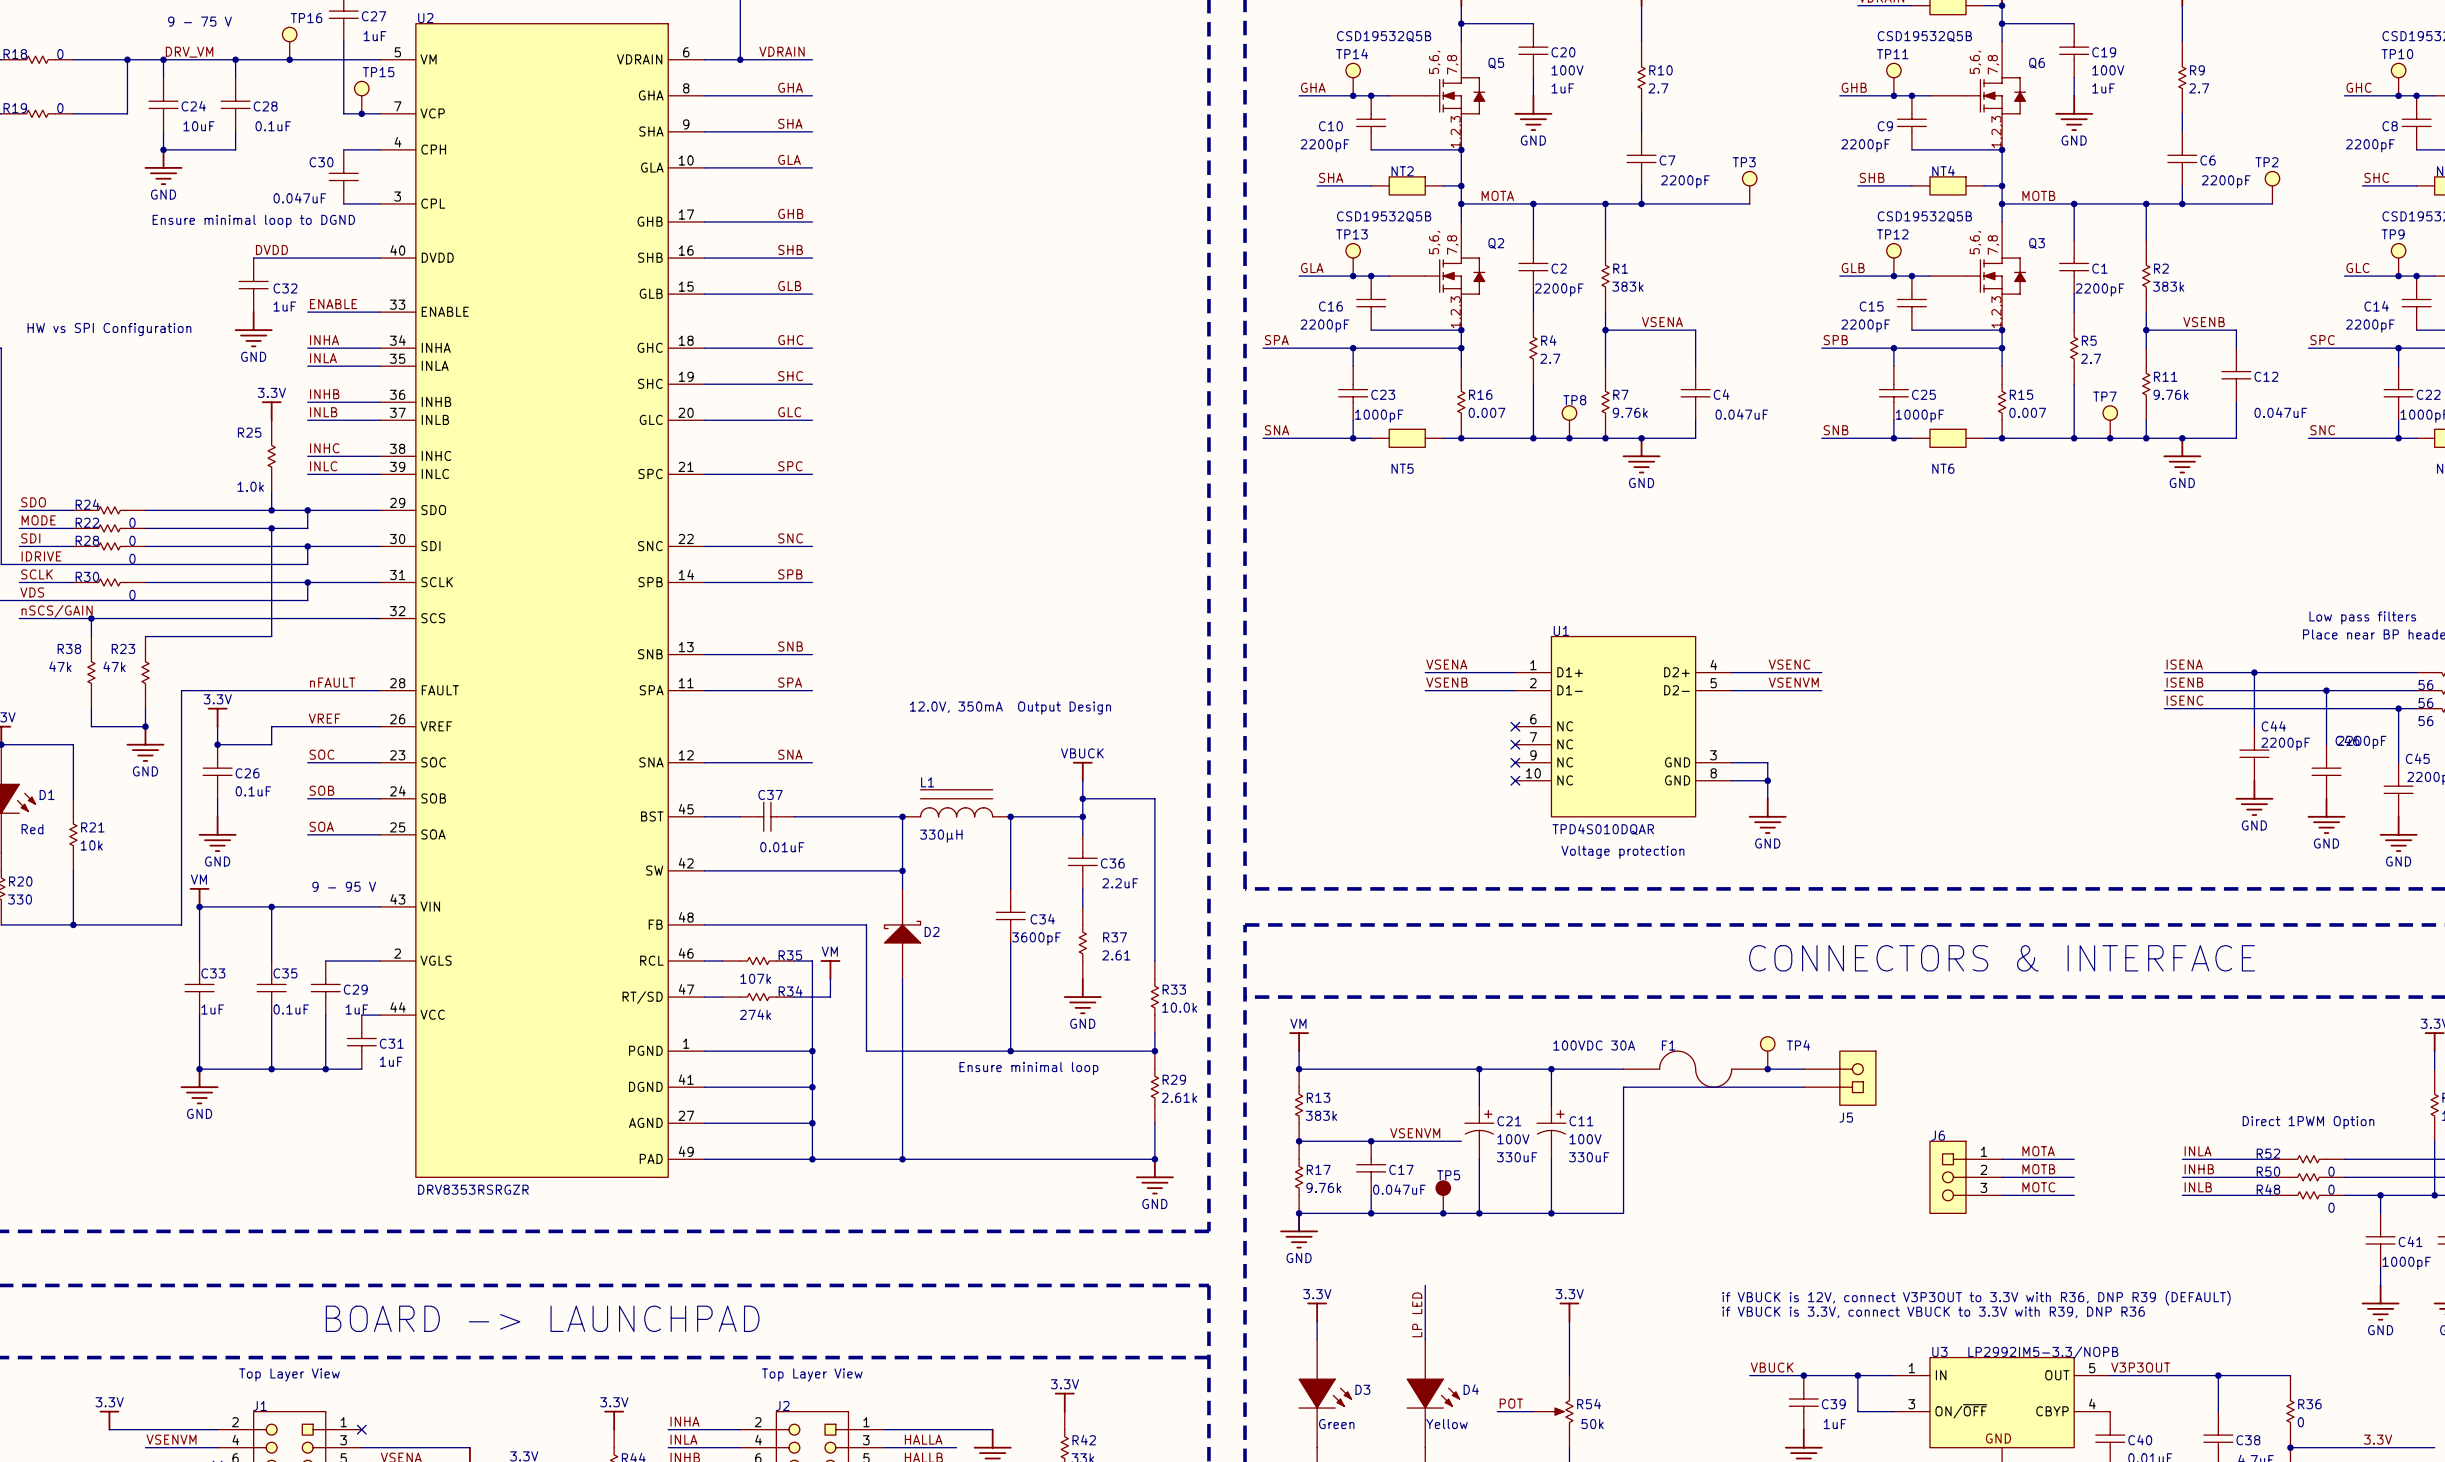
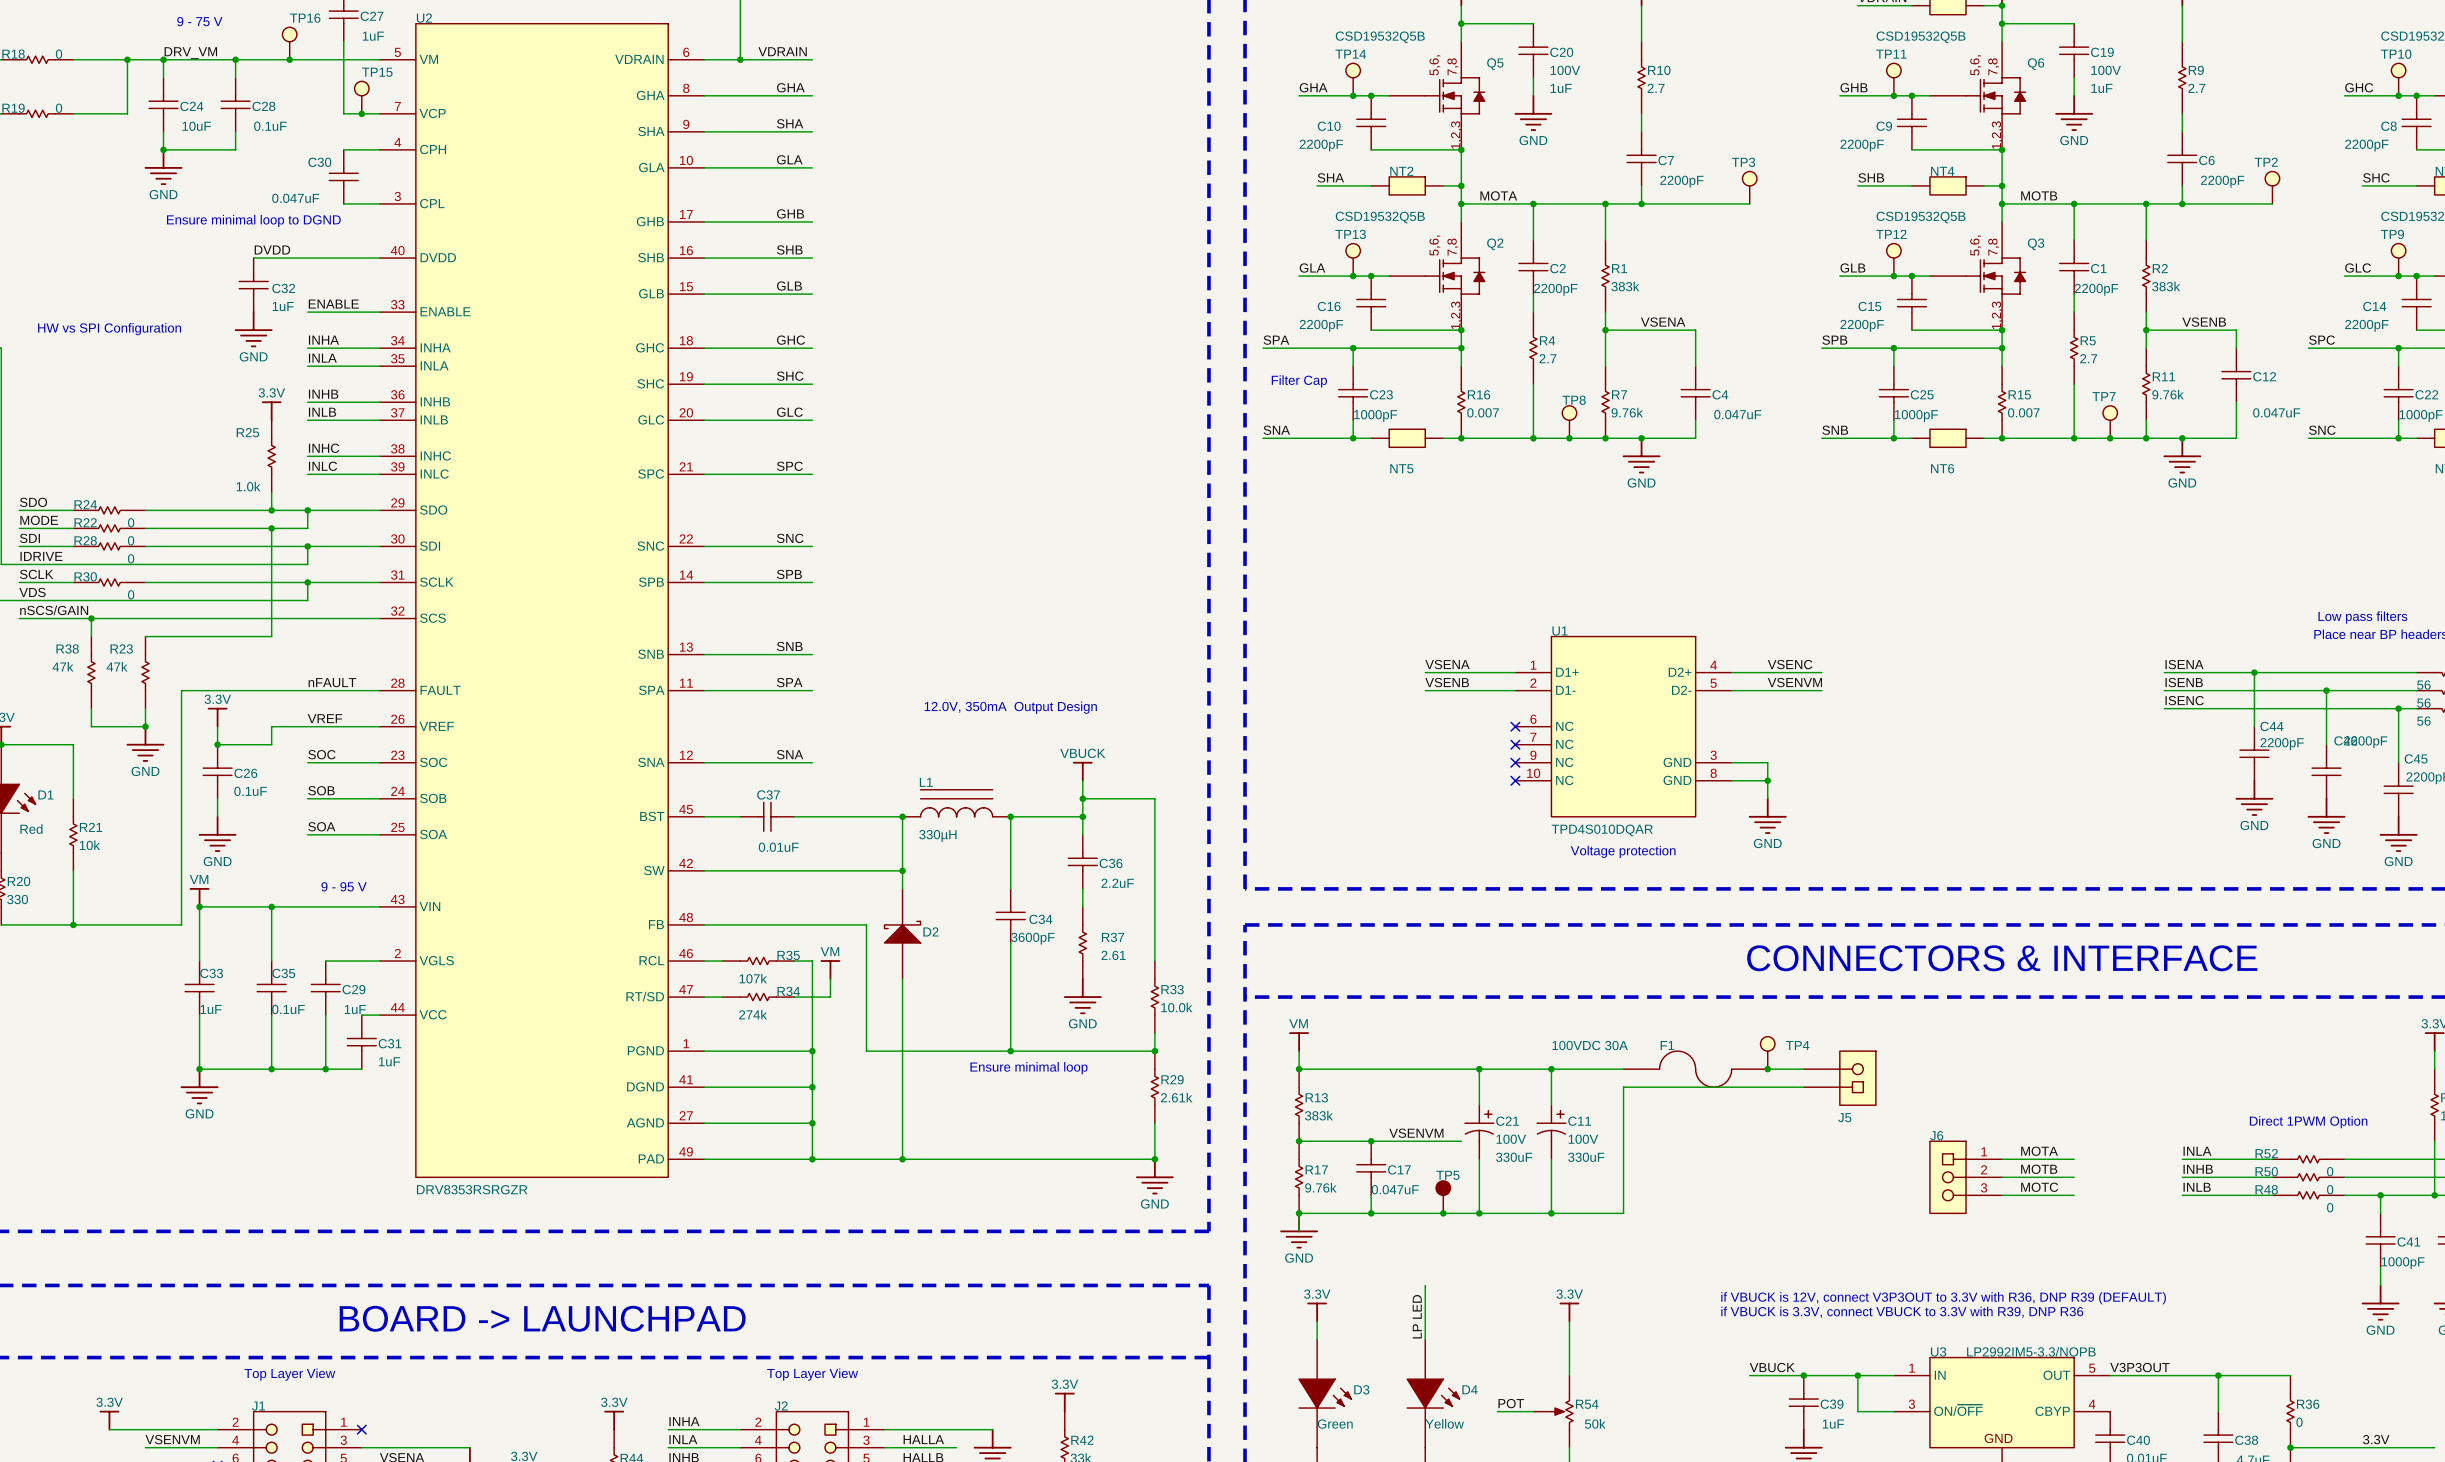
text: none -> Filter Cap (1299, 381)

